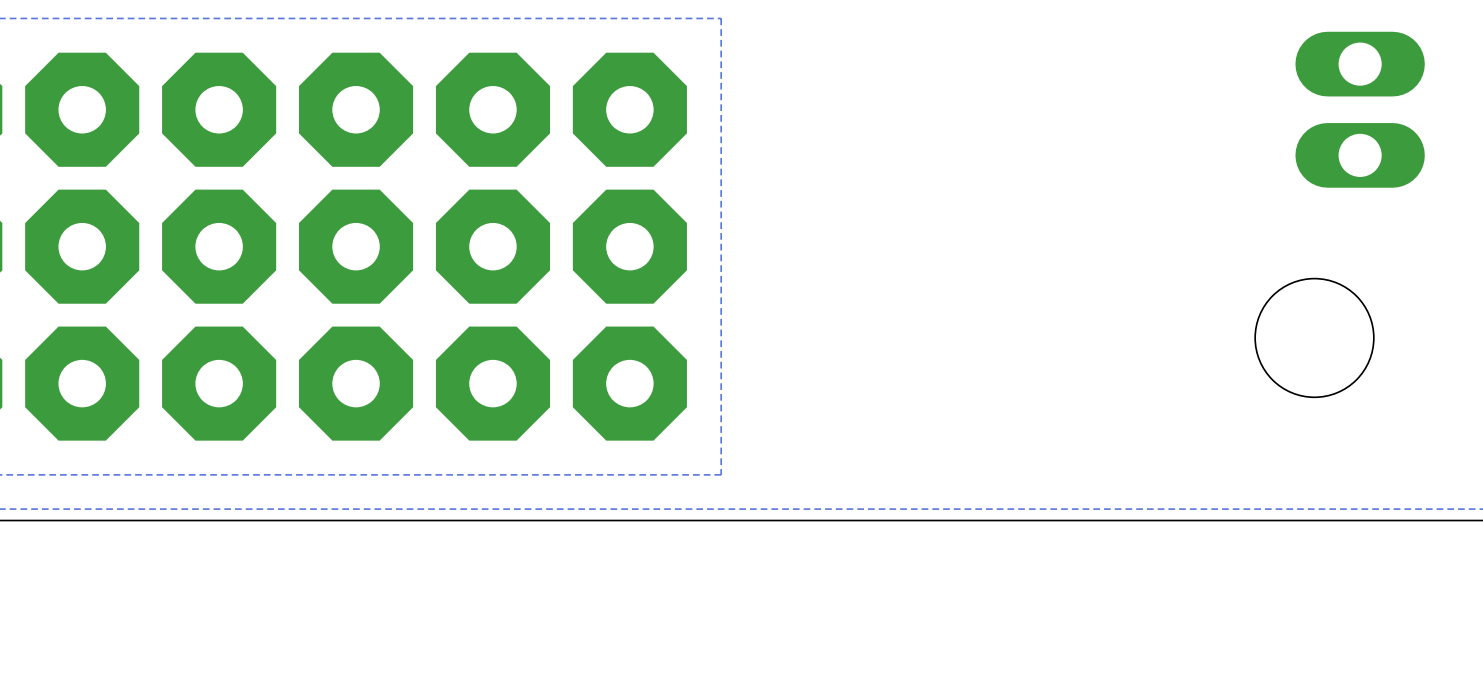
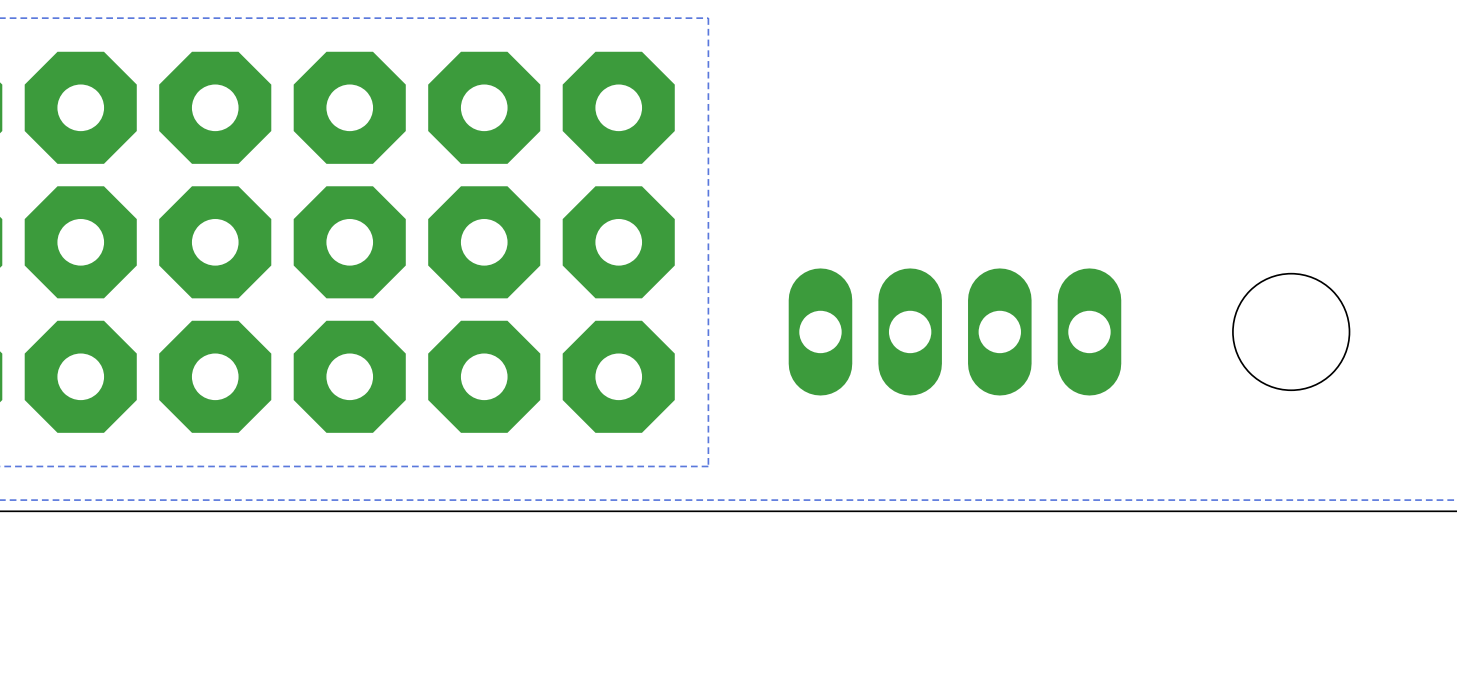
part: (1360, 109) -> none
part: none -> (954, 331)

